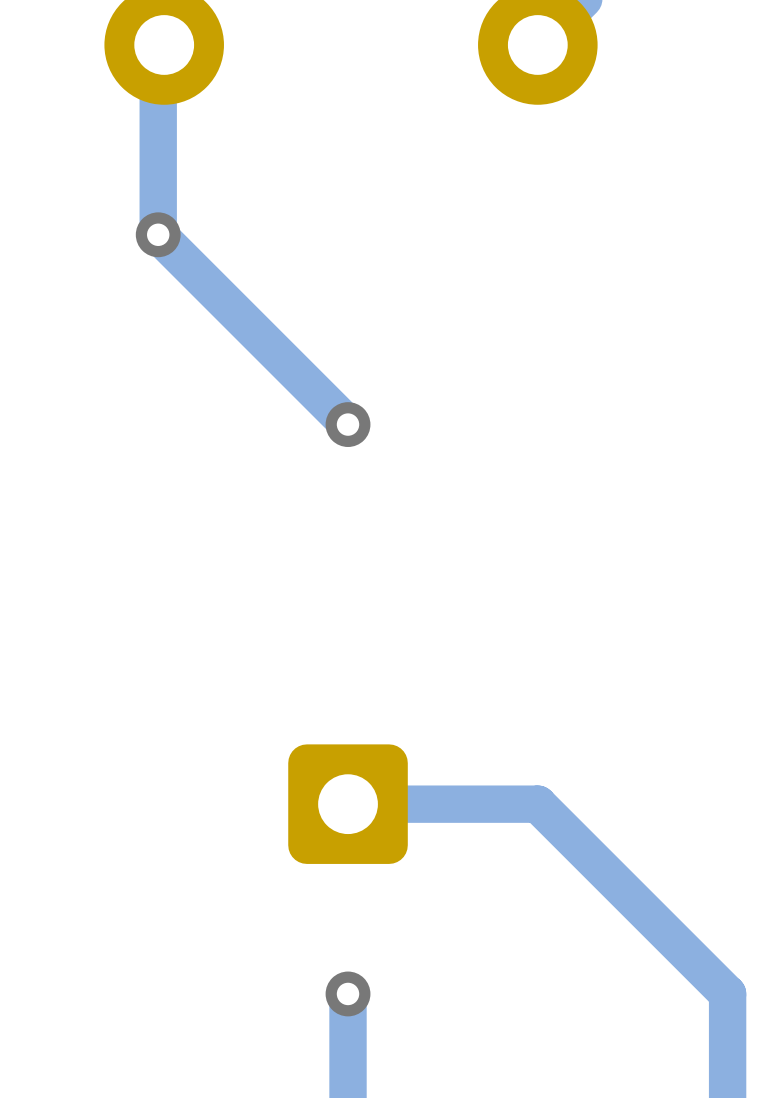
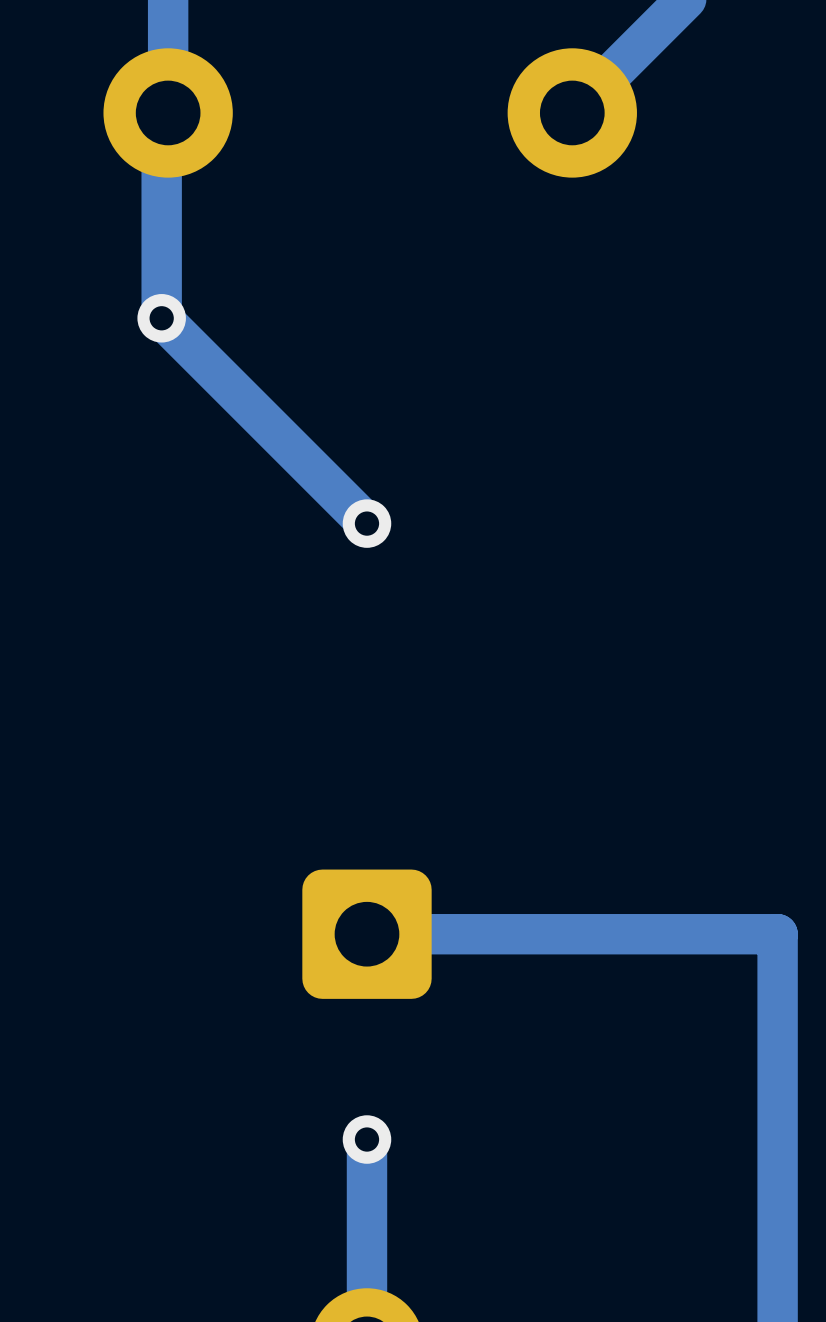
track: (537, 804) (727, 993) -> (572, 934) (777, 934) (777, 1139)

